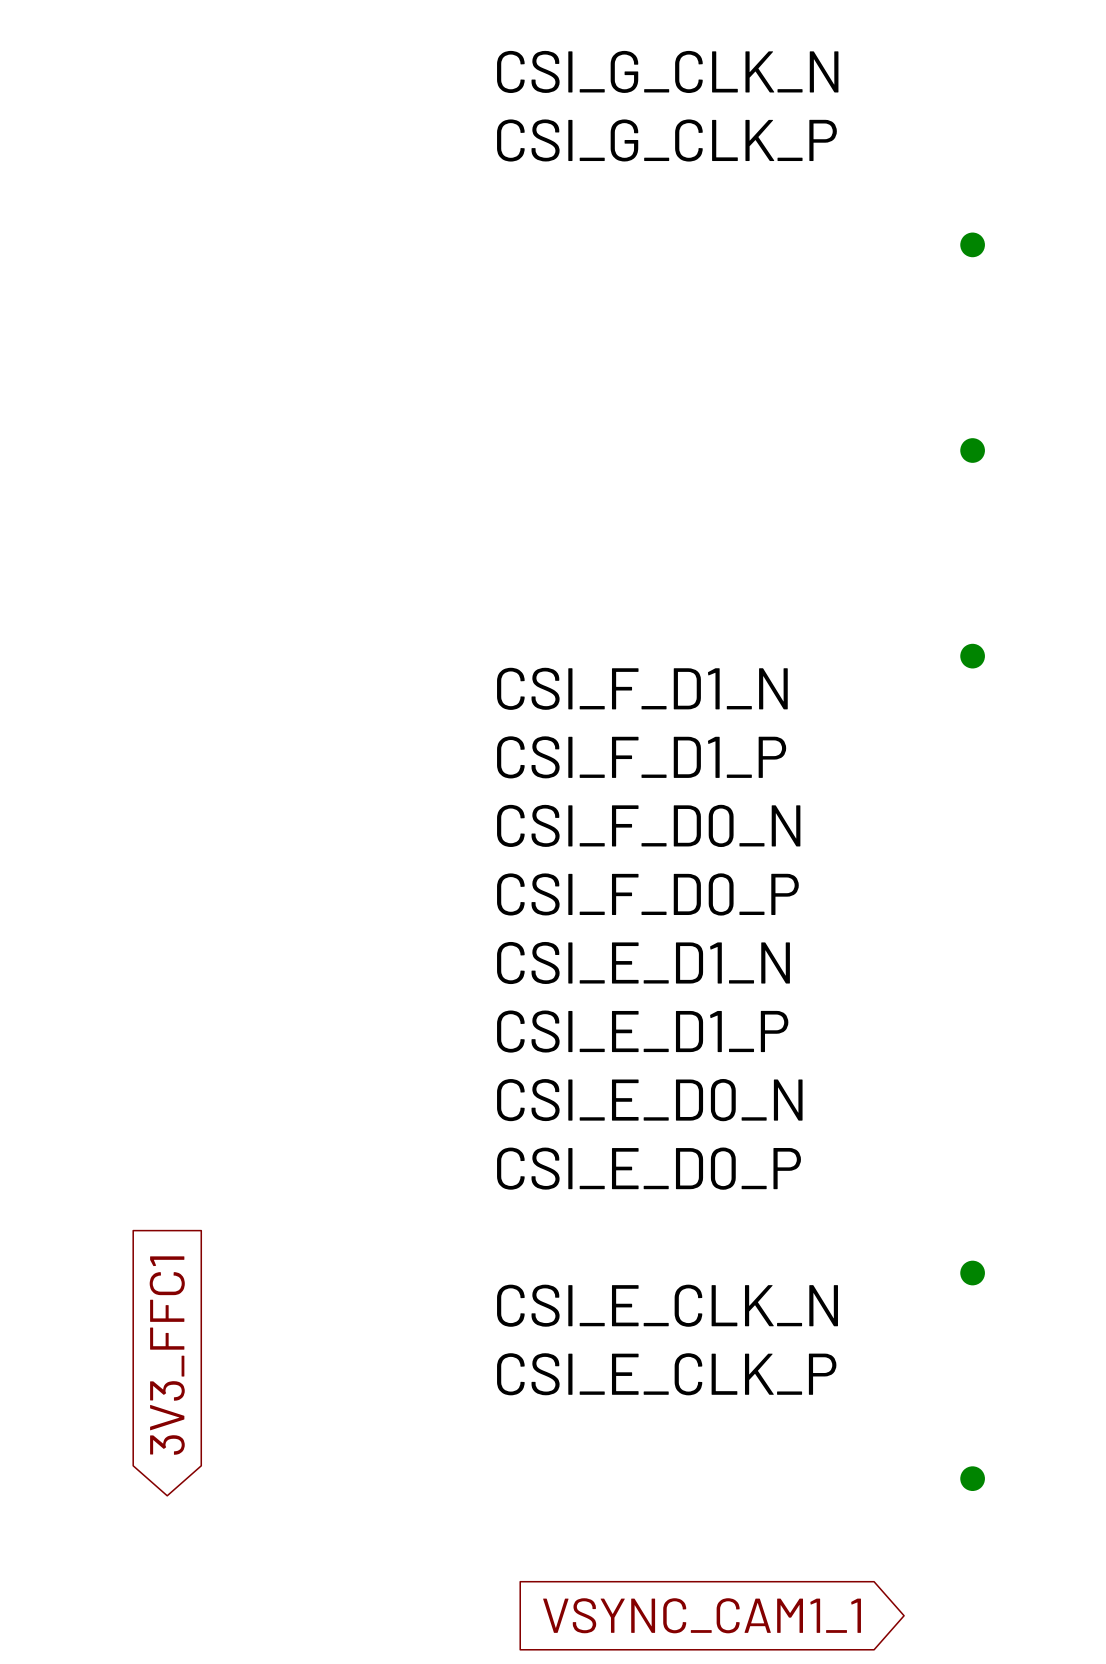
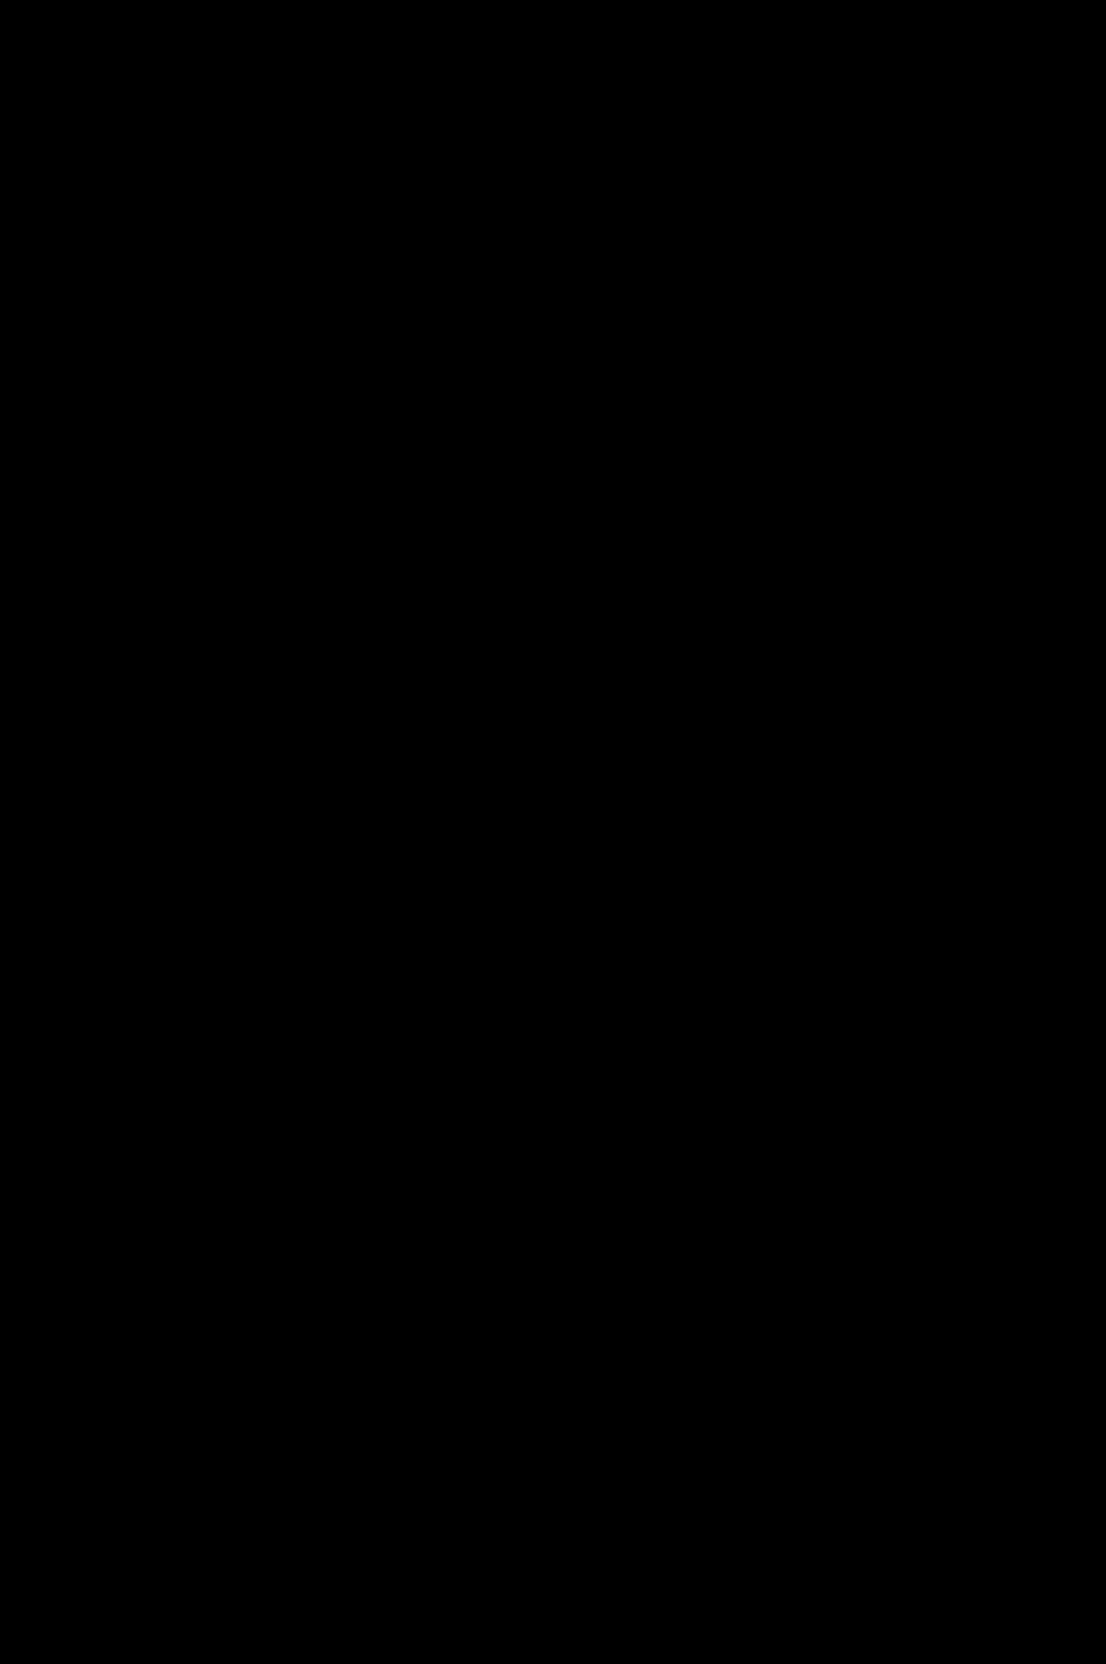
label: CSI_G_CLK_N (667, 71) -> none
label: CSI_G_CLK_P (666, 140) -> none
junction: (972, 244) -> none
junction: (972, 450) -> none
junction: (972, 656) -> none
label: CSI_F_D1_N (642, 688) -> none
label: CSI_F_D1_P (641, 757) -> none
label: CSI_F_D0_N (648, 825) -> none
label: CSI_F_D0_P (647, 894) -> none
label: CSI_E_D1_N (643, 963) -> none
label: CSI_E_D1_P (642, 1031) -> none
label: CSI_E_D0_N (649, 1100) -> none
label: CSI_E_D0_P (649, 1168) -> none
junction: (972, 1273) -> none
label: CSI_E_CLK_N (667, 1305) -> none
global label: 3V3_FFC1 (167, 1355) -> none
label: CSI_E_CLK_P (666, 1374) -> none
junction: (972, 1478) -> none
global label: VSYNC_CAM1_1 (702, 1615) -> none

